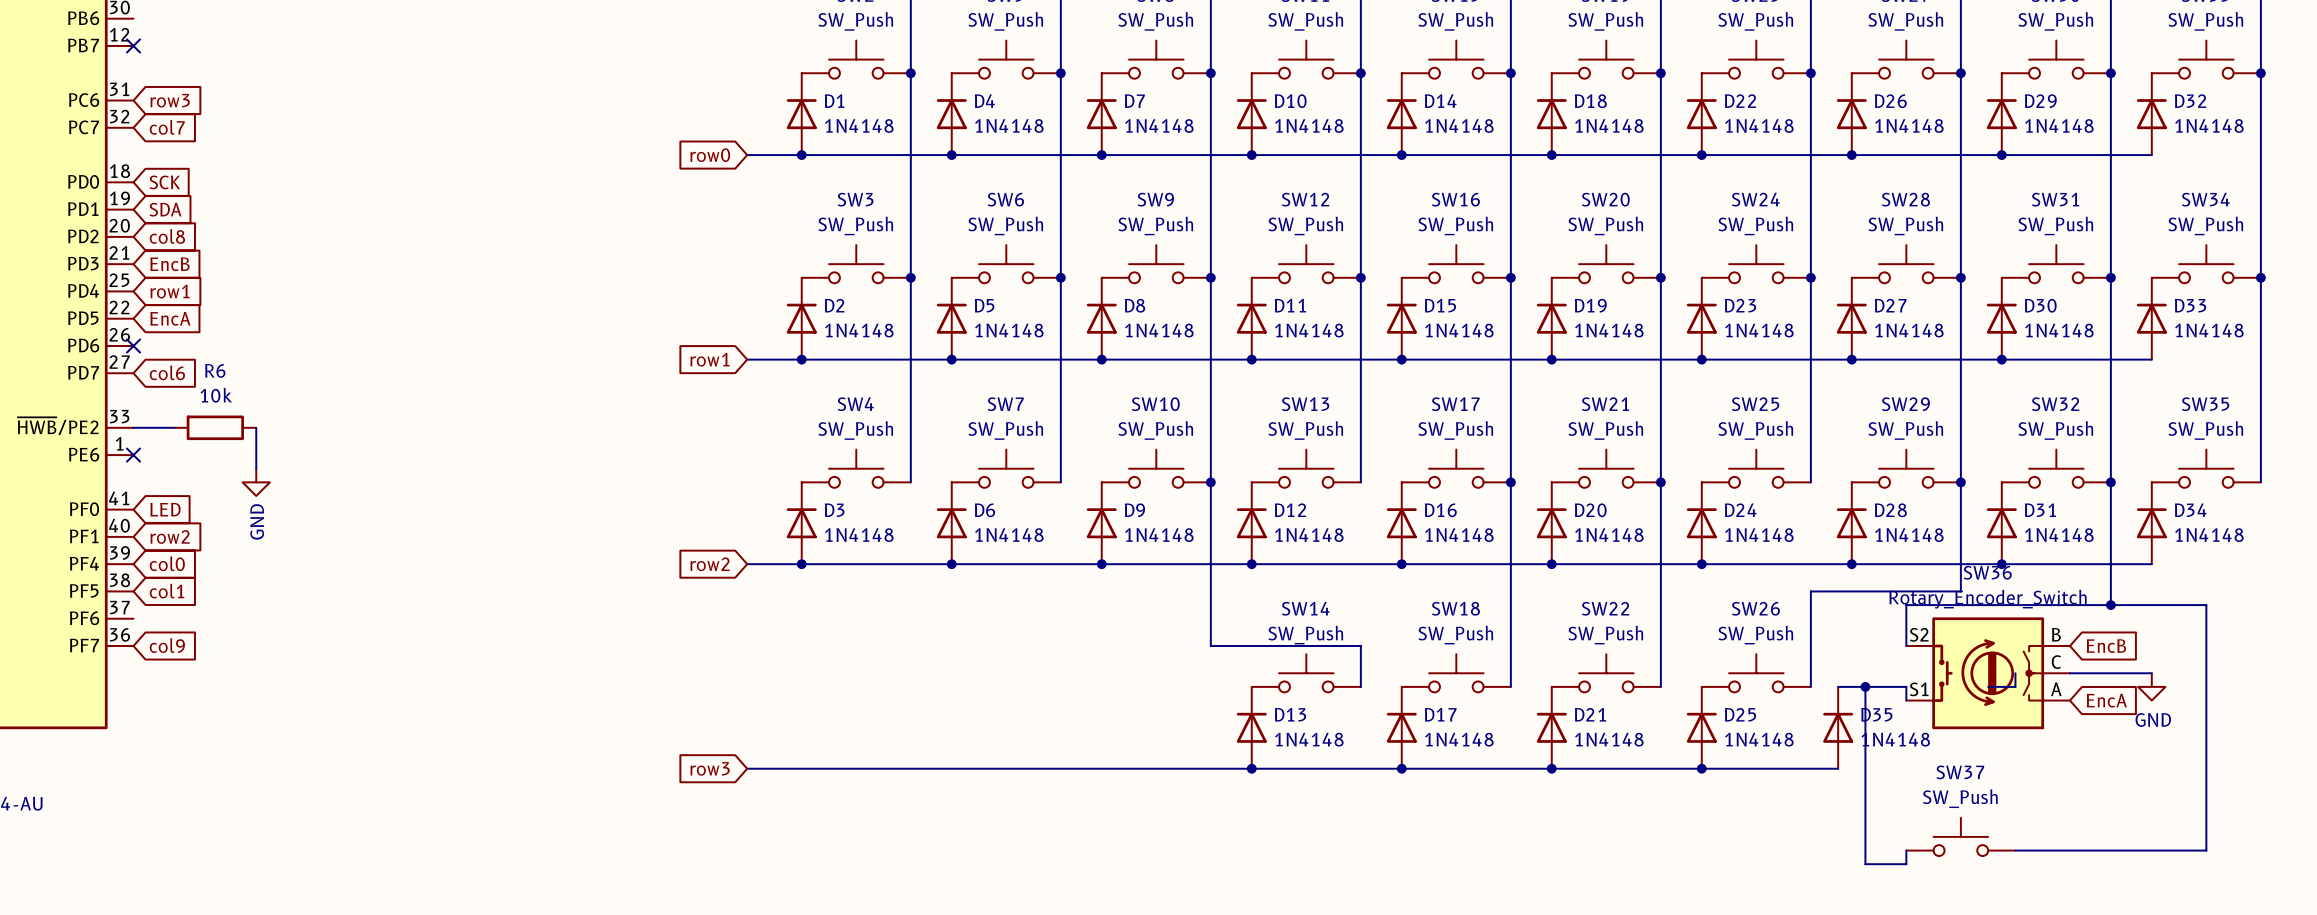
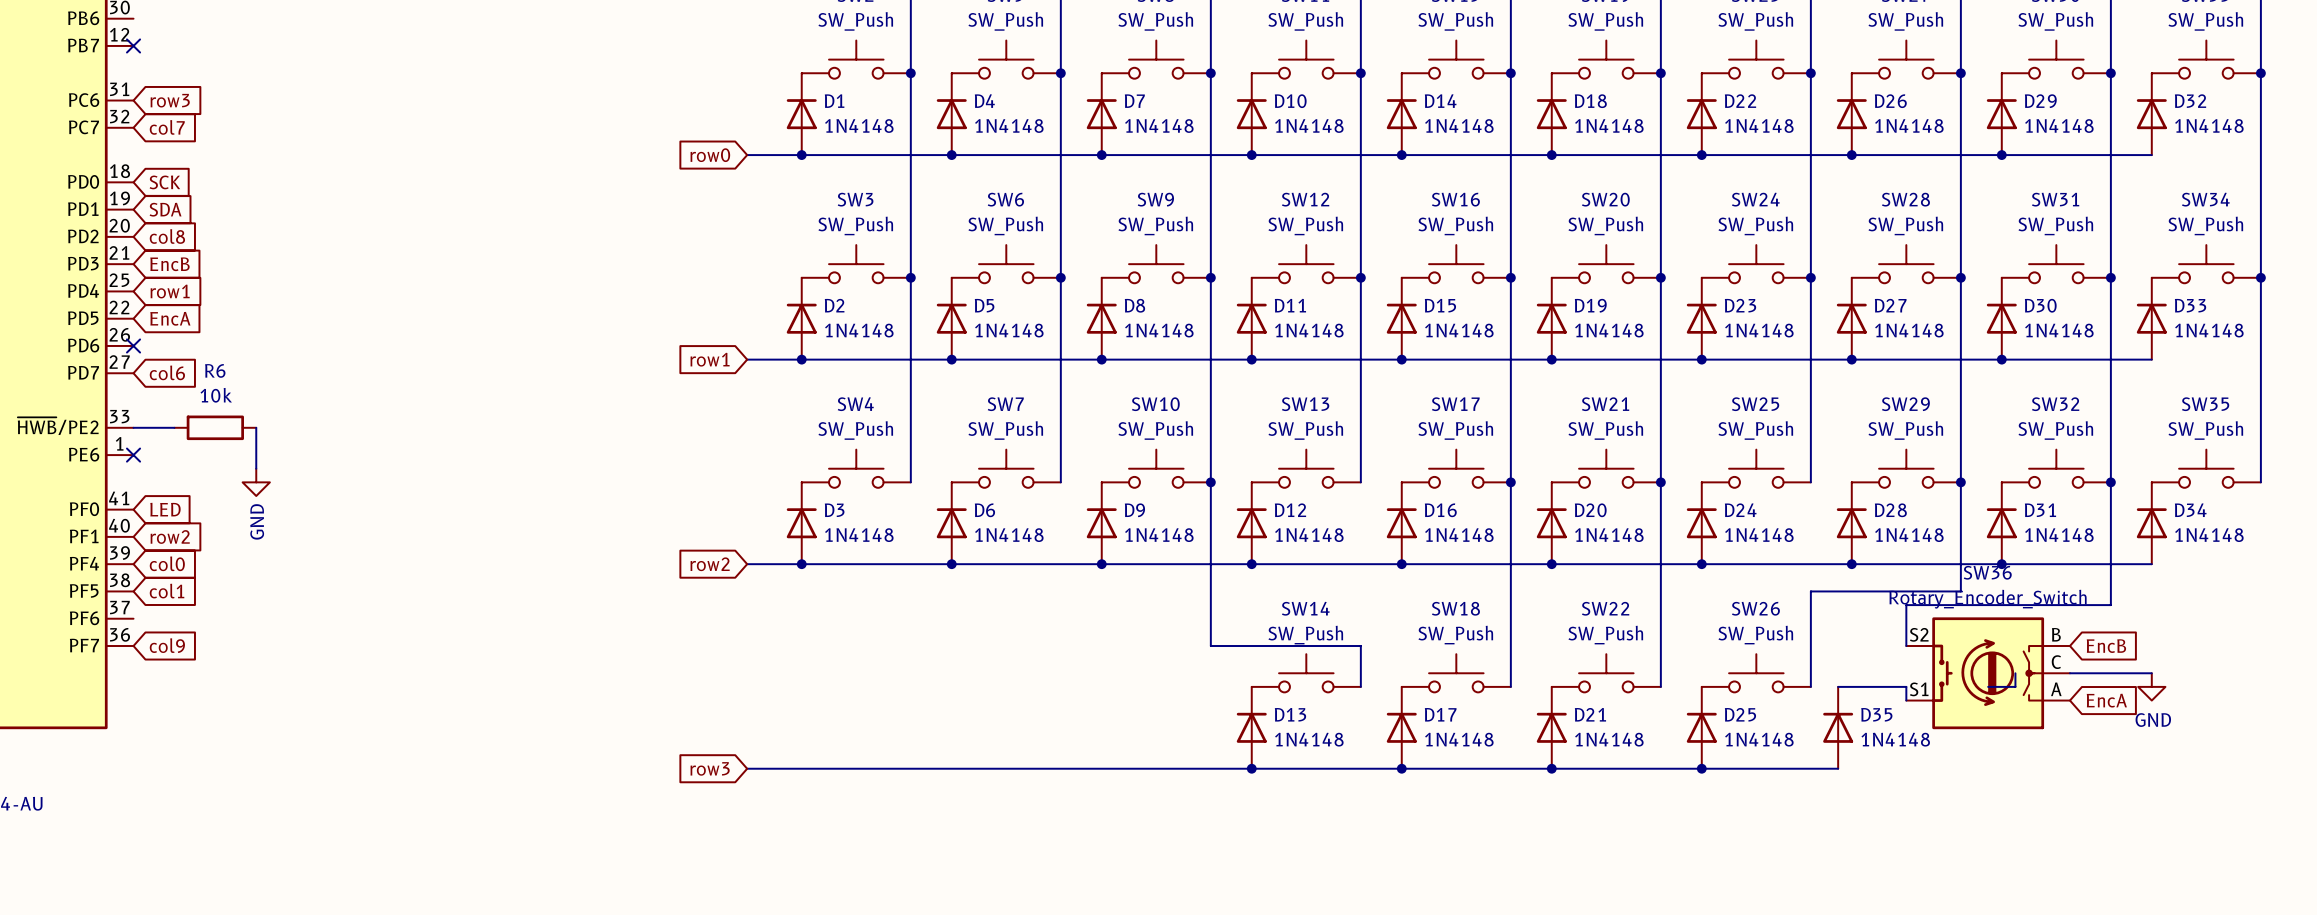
wire: (2110, 605) (2206, 605) (2206, 850) (2015, 850) -> none
junction: (2110, 605) -> none
wire: (1865, 686) (1865, 864) (1906, 864) (1906, 850) -> none
junction: (1865, 686) -> none
SW37: SW_Push (1960, 836) -> none

